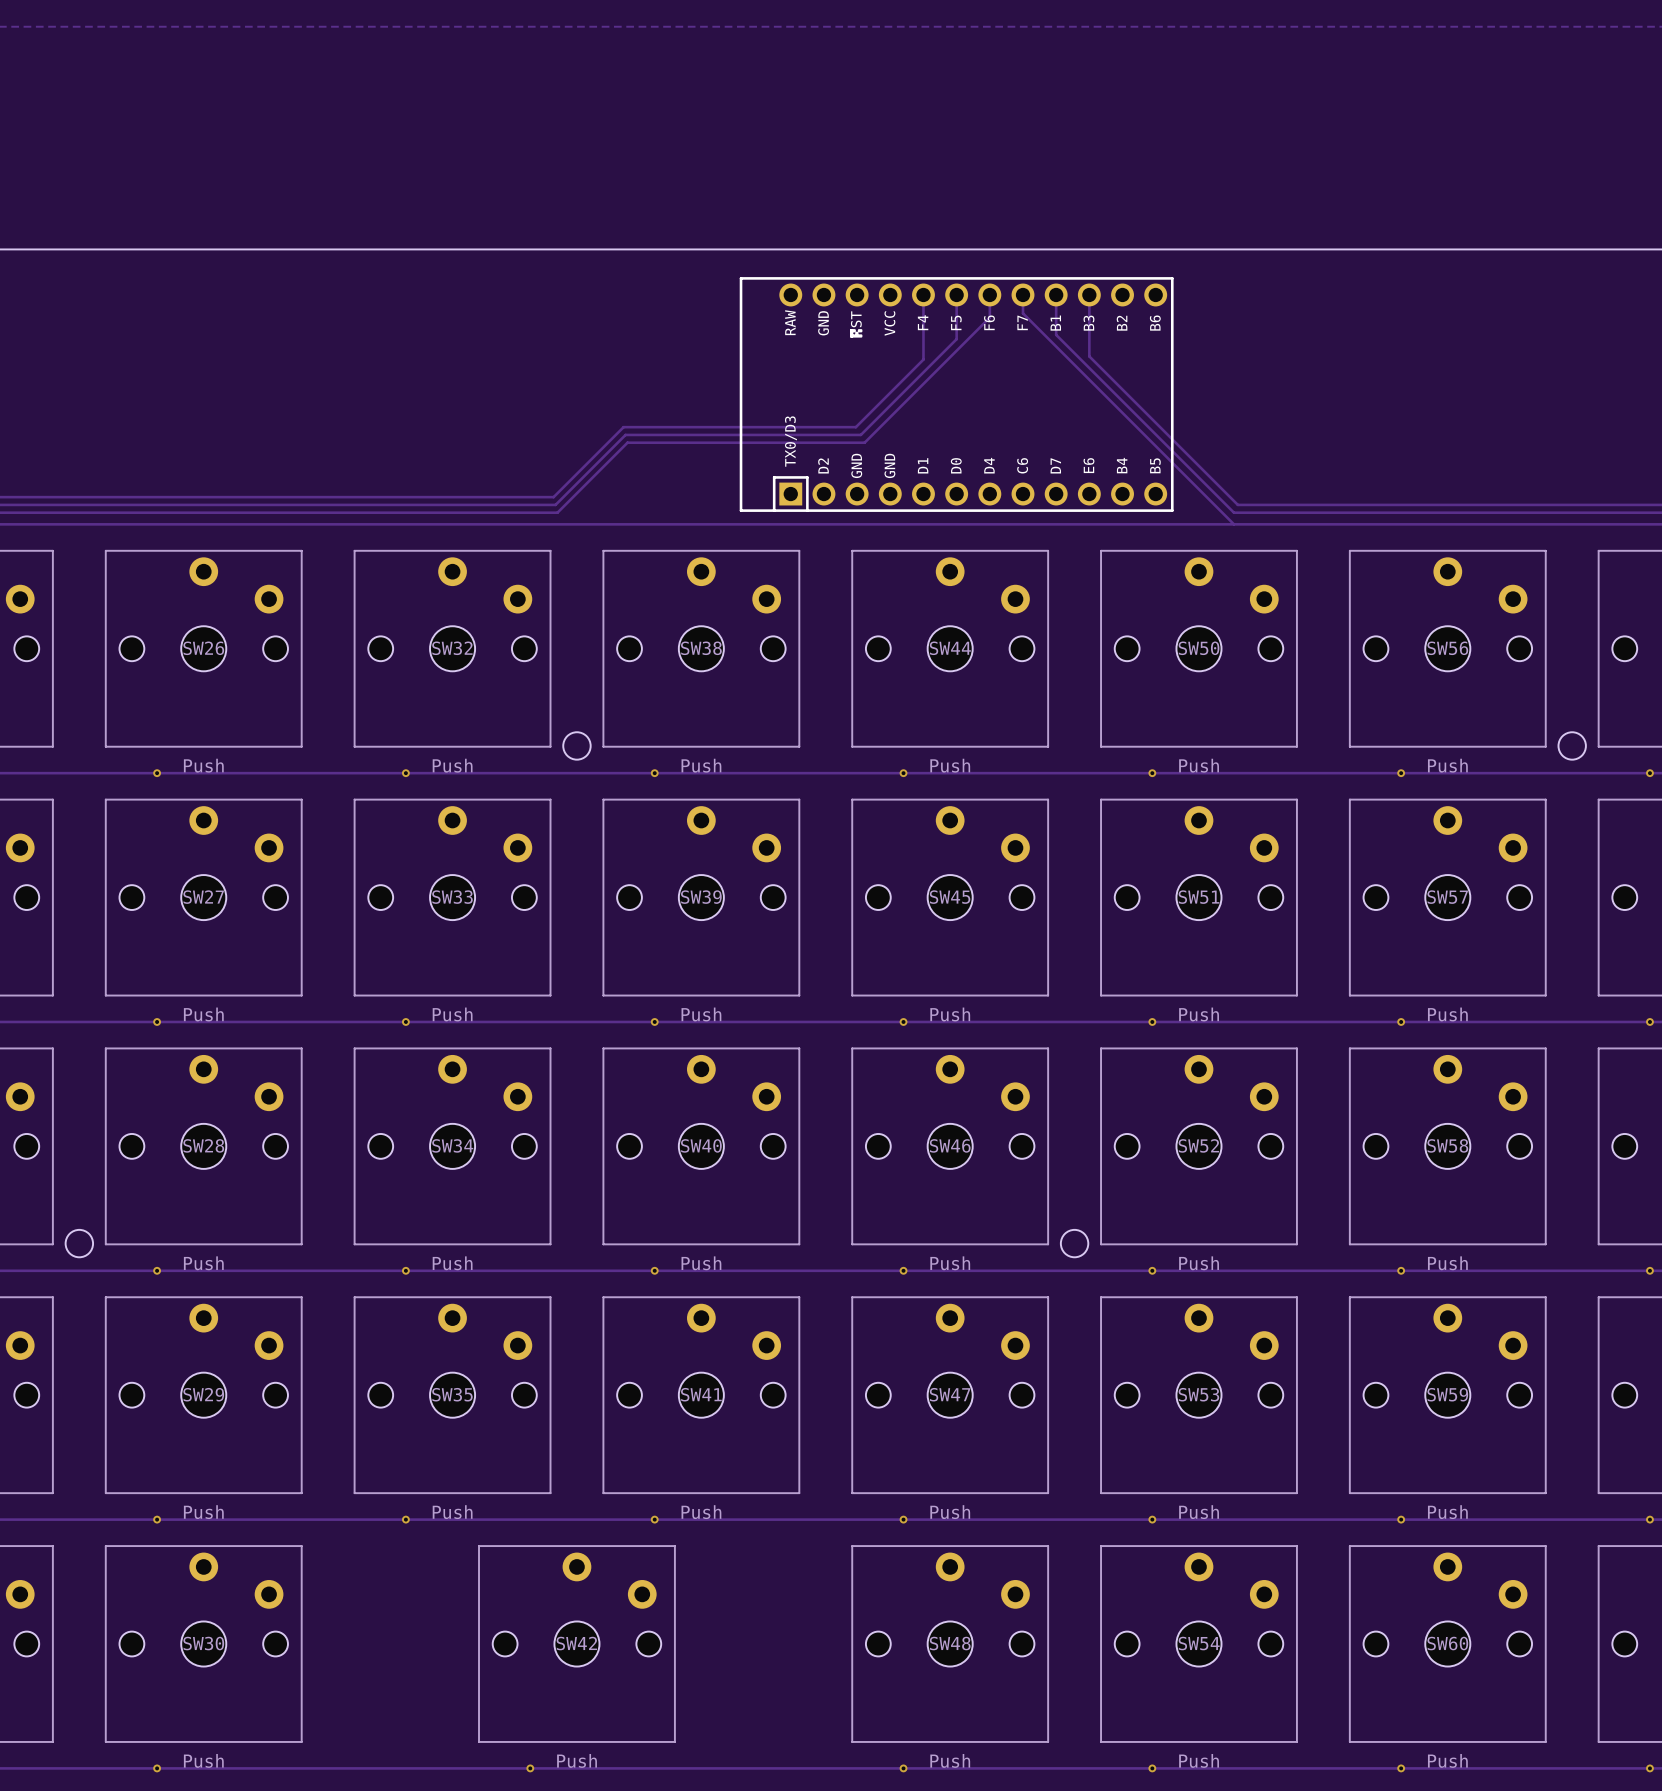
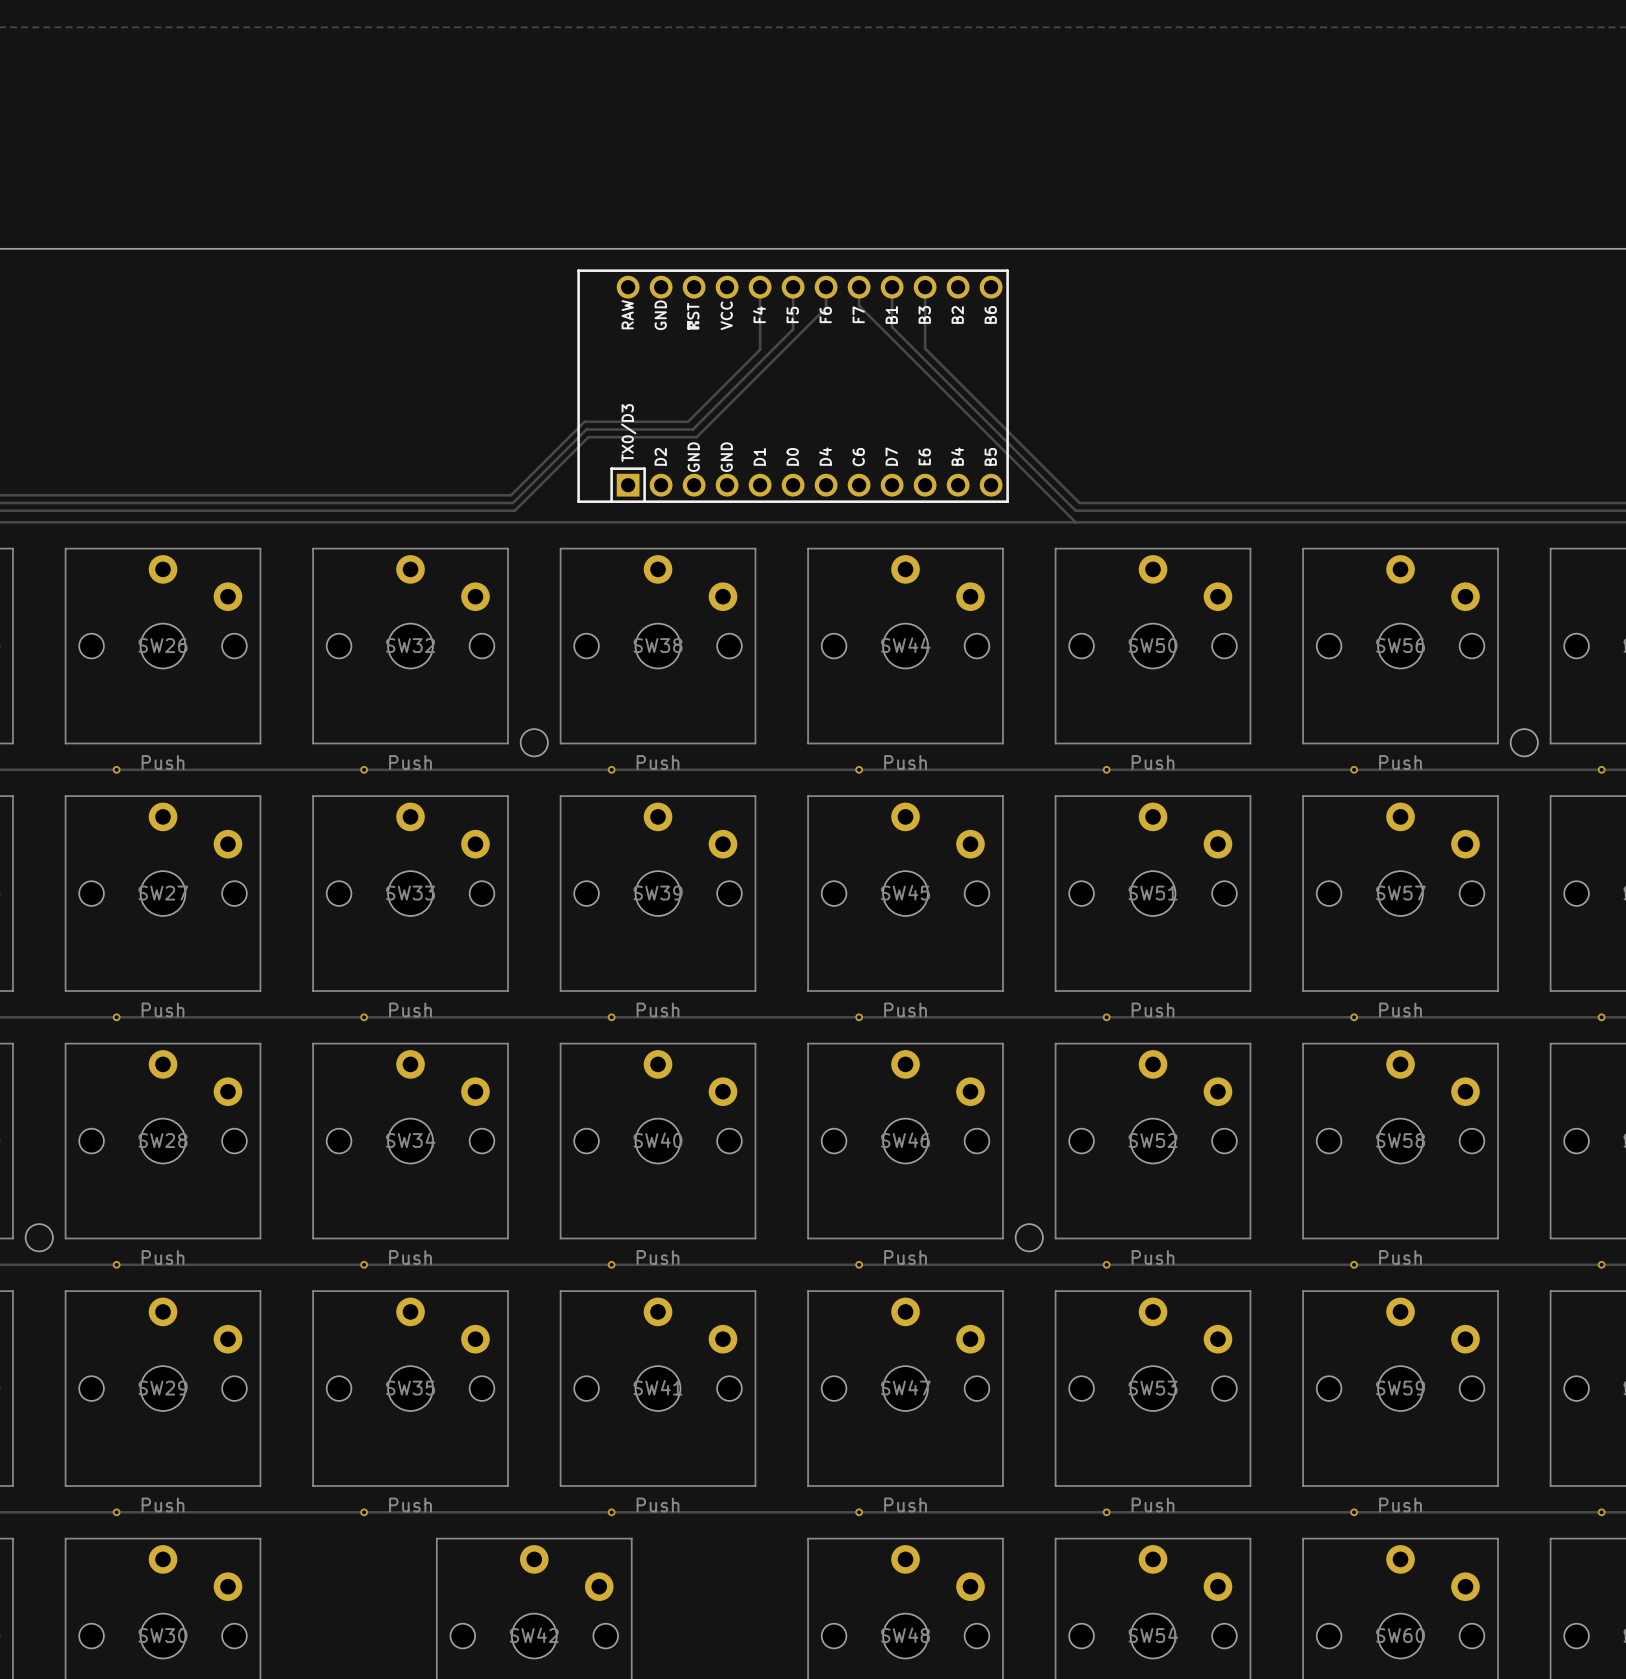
track: none -> (859, 287) (859, 305) (1075, 522)
track: (923, 294) (923, 359) (855, 427) (623, 427) -> (760, 287) (760, 349) (687, 421) (584, 421) (580, 425)
track: (956, 294) (956, 339) (860, 434) (625, 434) -> (793, 287) (793, 329) (692, 429) (586, 429) (582, 433)
track: (989, 294) (989, 317) (864, 442) (627, 442) -> (826, 287) (826, 307) (696, 437) (588, 437) (584, 441)
track: (1023, 294) (1023, 313) (1233, 524) -> none
track: (1056, 294) (1056, 334) (1233, 512) -> (892, 287) (892, 327) (1075, 510) (1187, 510)
track: (1089, 294) (1089, 356) (1237, 504) -> (925, 287) (925, 348) (1079, 502) (1191, 502)
part position: (956, 394) -> (793, 386)

